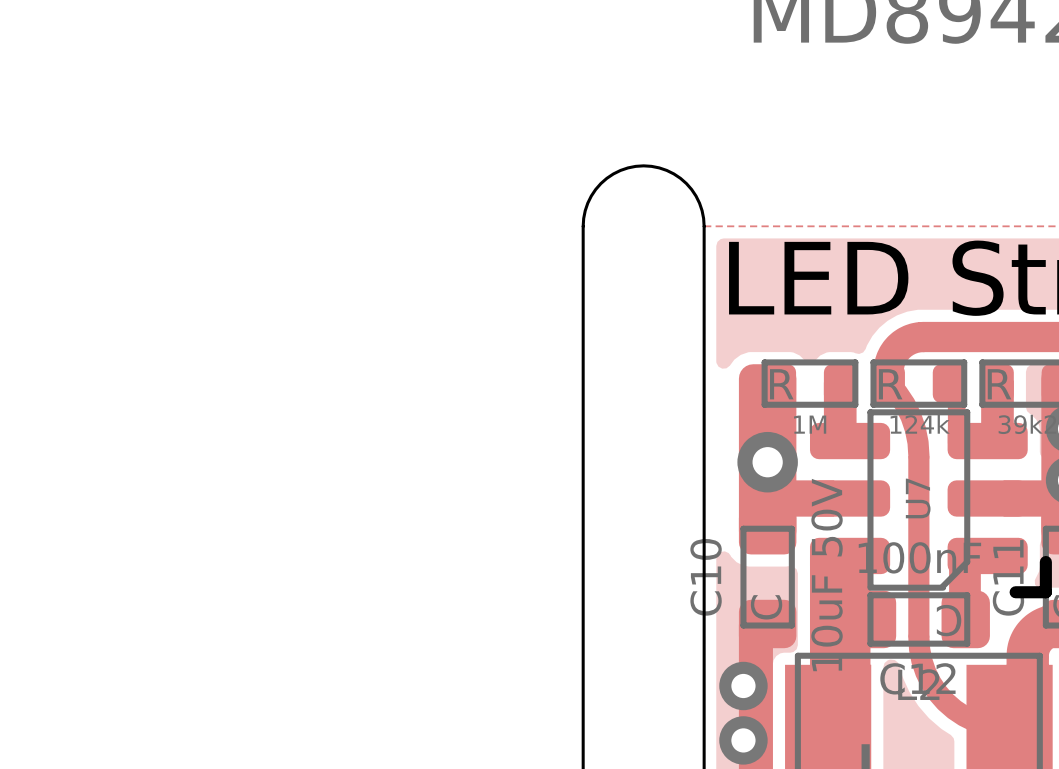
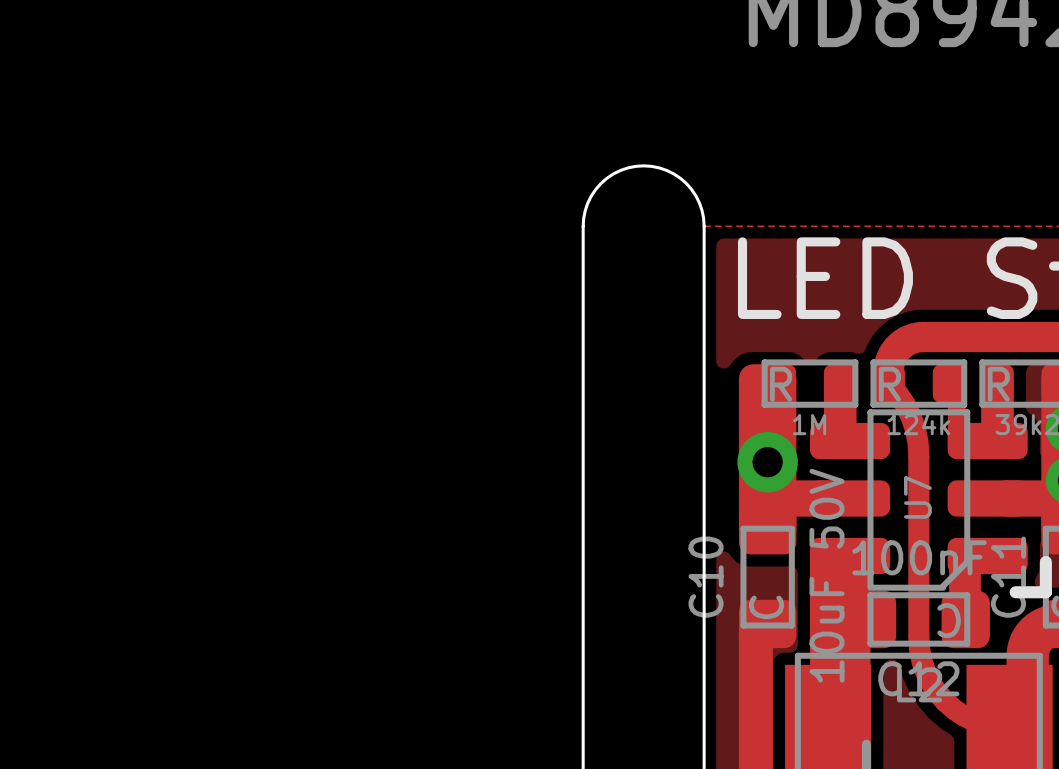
via: (743, 685) -> none
via: (743, 740) -> none

